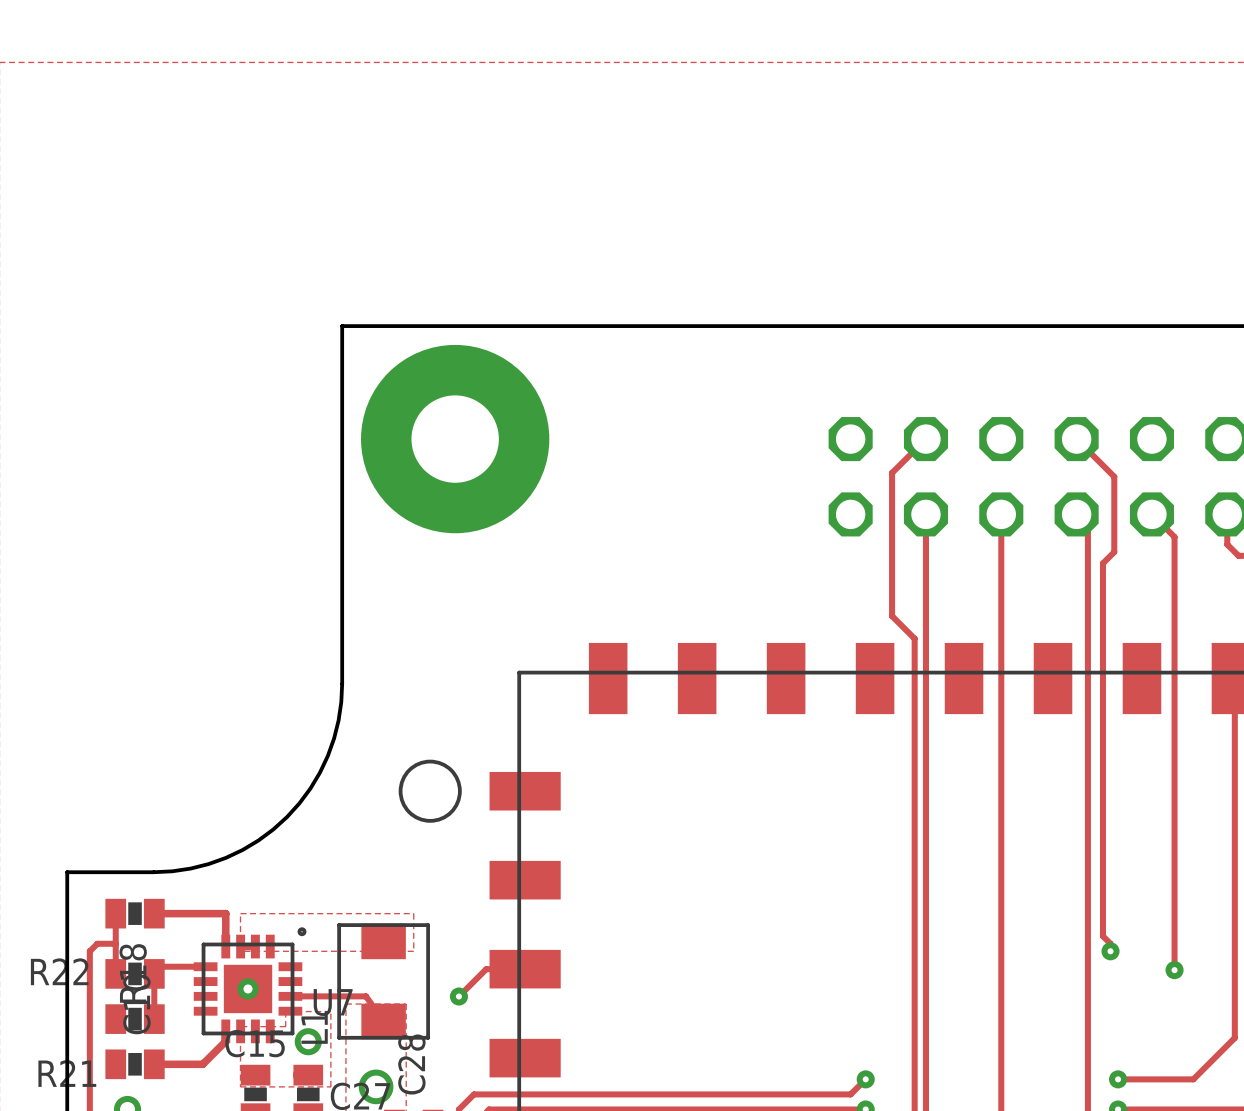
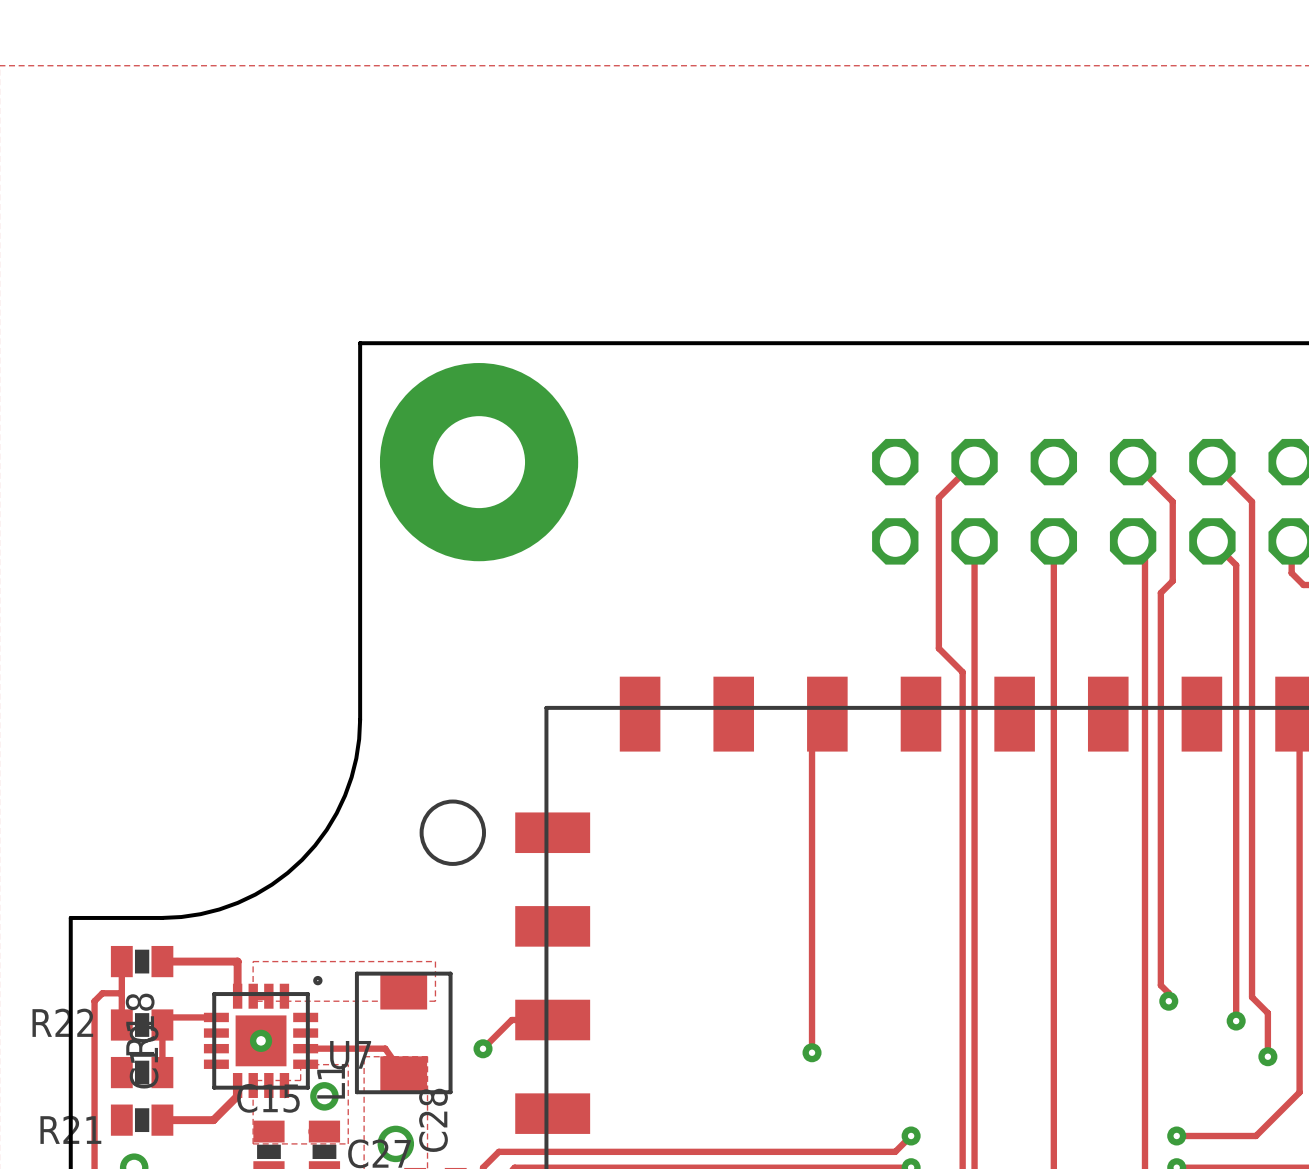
track: none -> (1212, 462) (1252, 501) (1252, 997) (1267, 1013) (1267, 1056)
track: none -> (827, 714) (812, 729) (812, 1052)
via: none -> (812, 1052)
via: none -> (1267, 1056)

